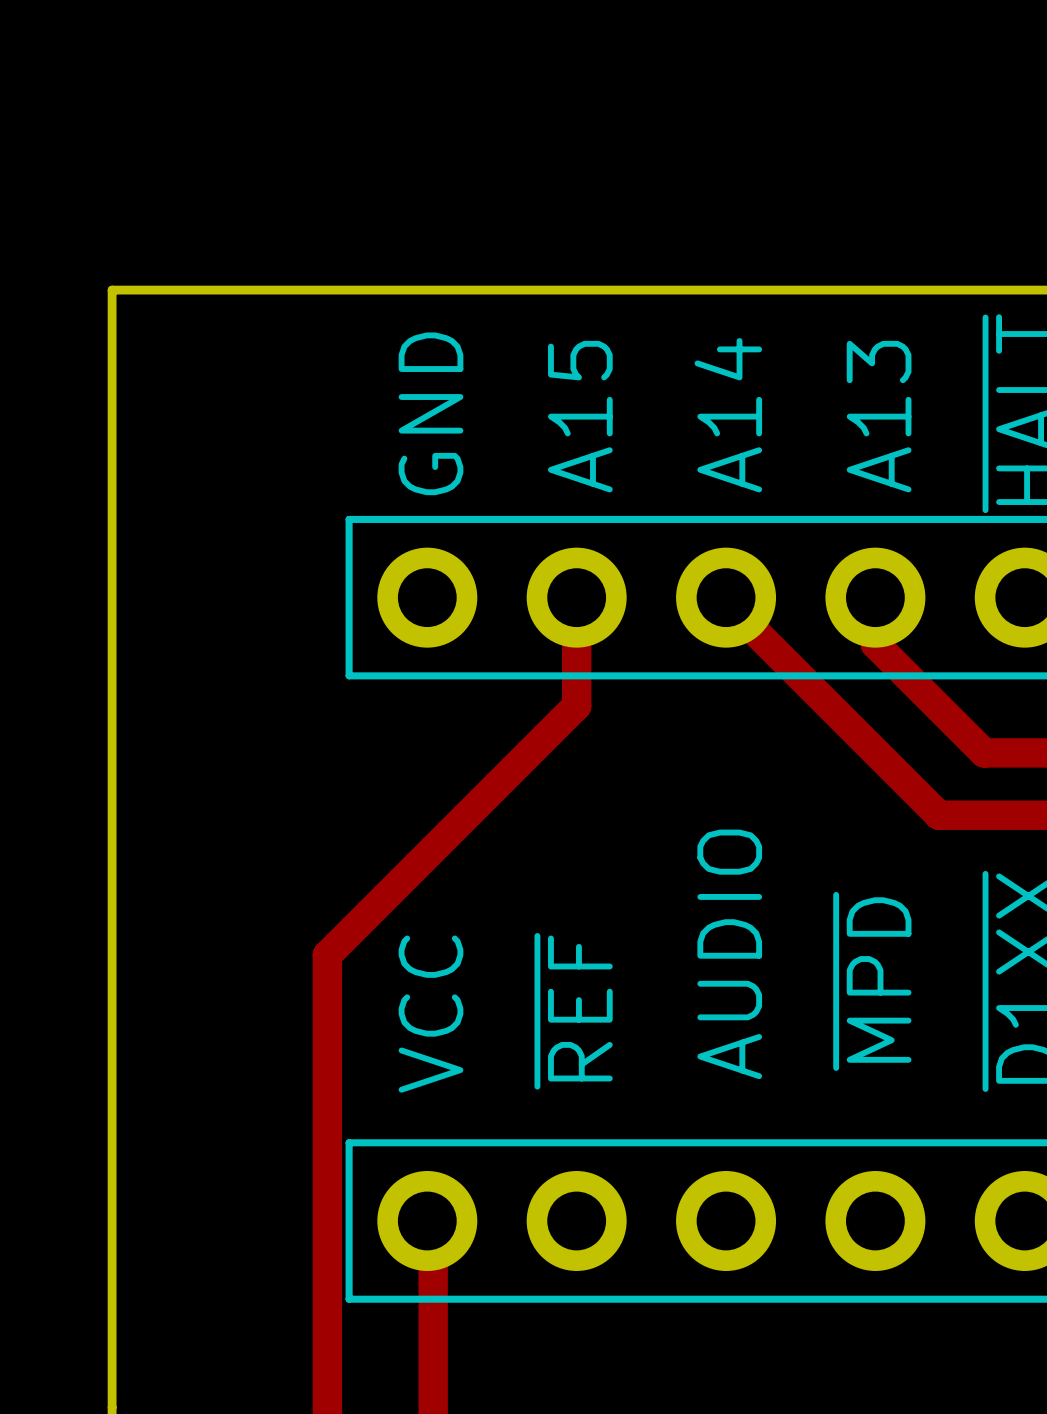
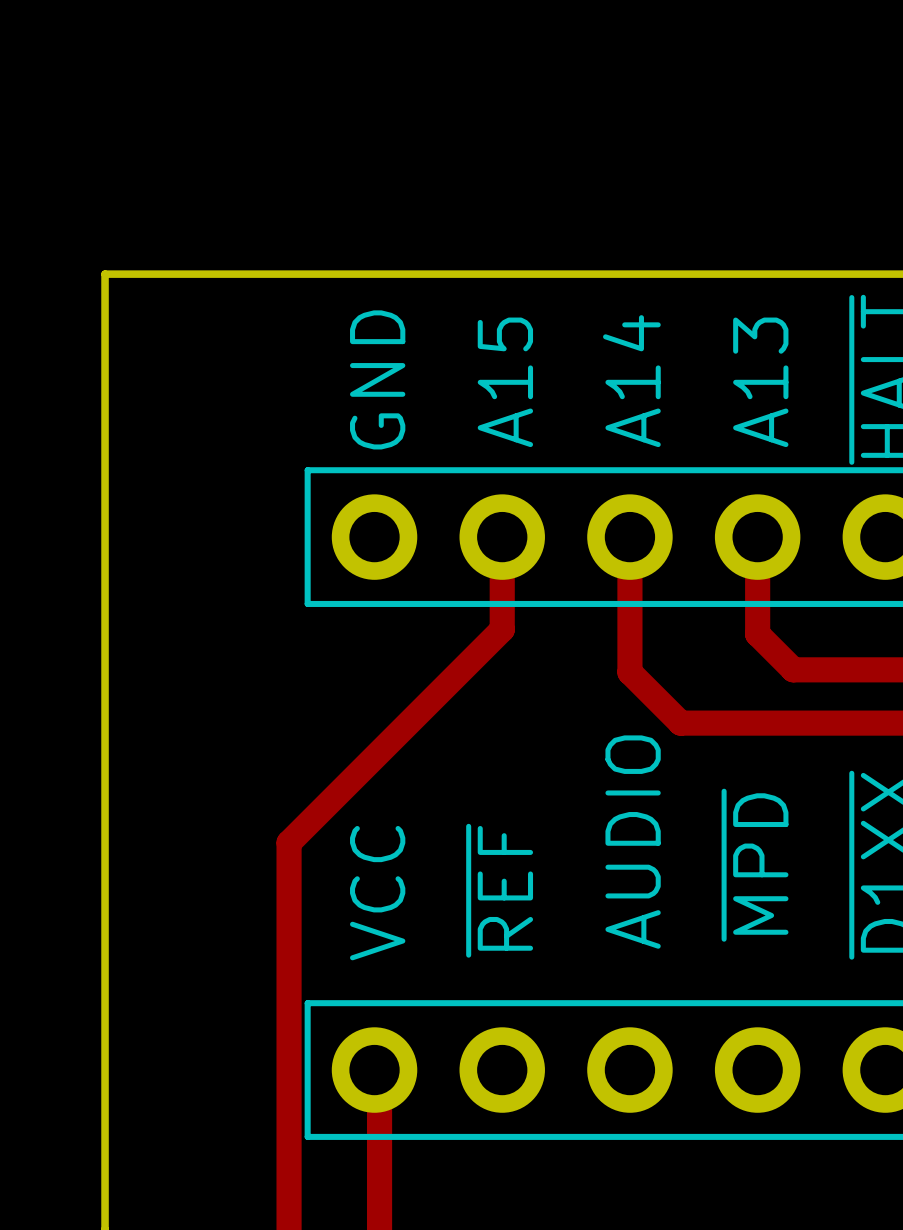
track: (726, 602) (938, 815) -> (629, 541) (629, 672) (680, 723) (811, 723)
track: (875, 644) (984, 752) -> (757, 576) (757, 634) (793, 669) (850, 669)

